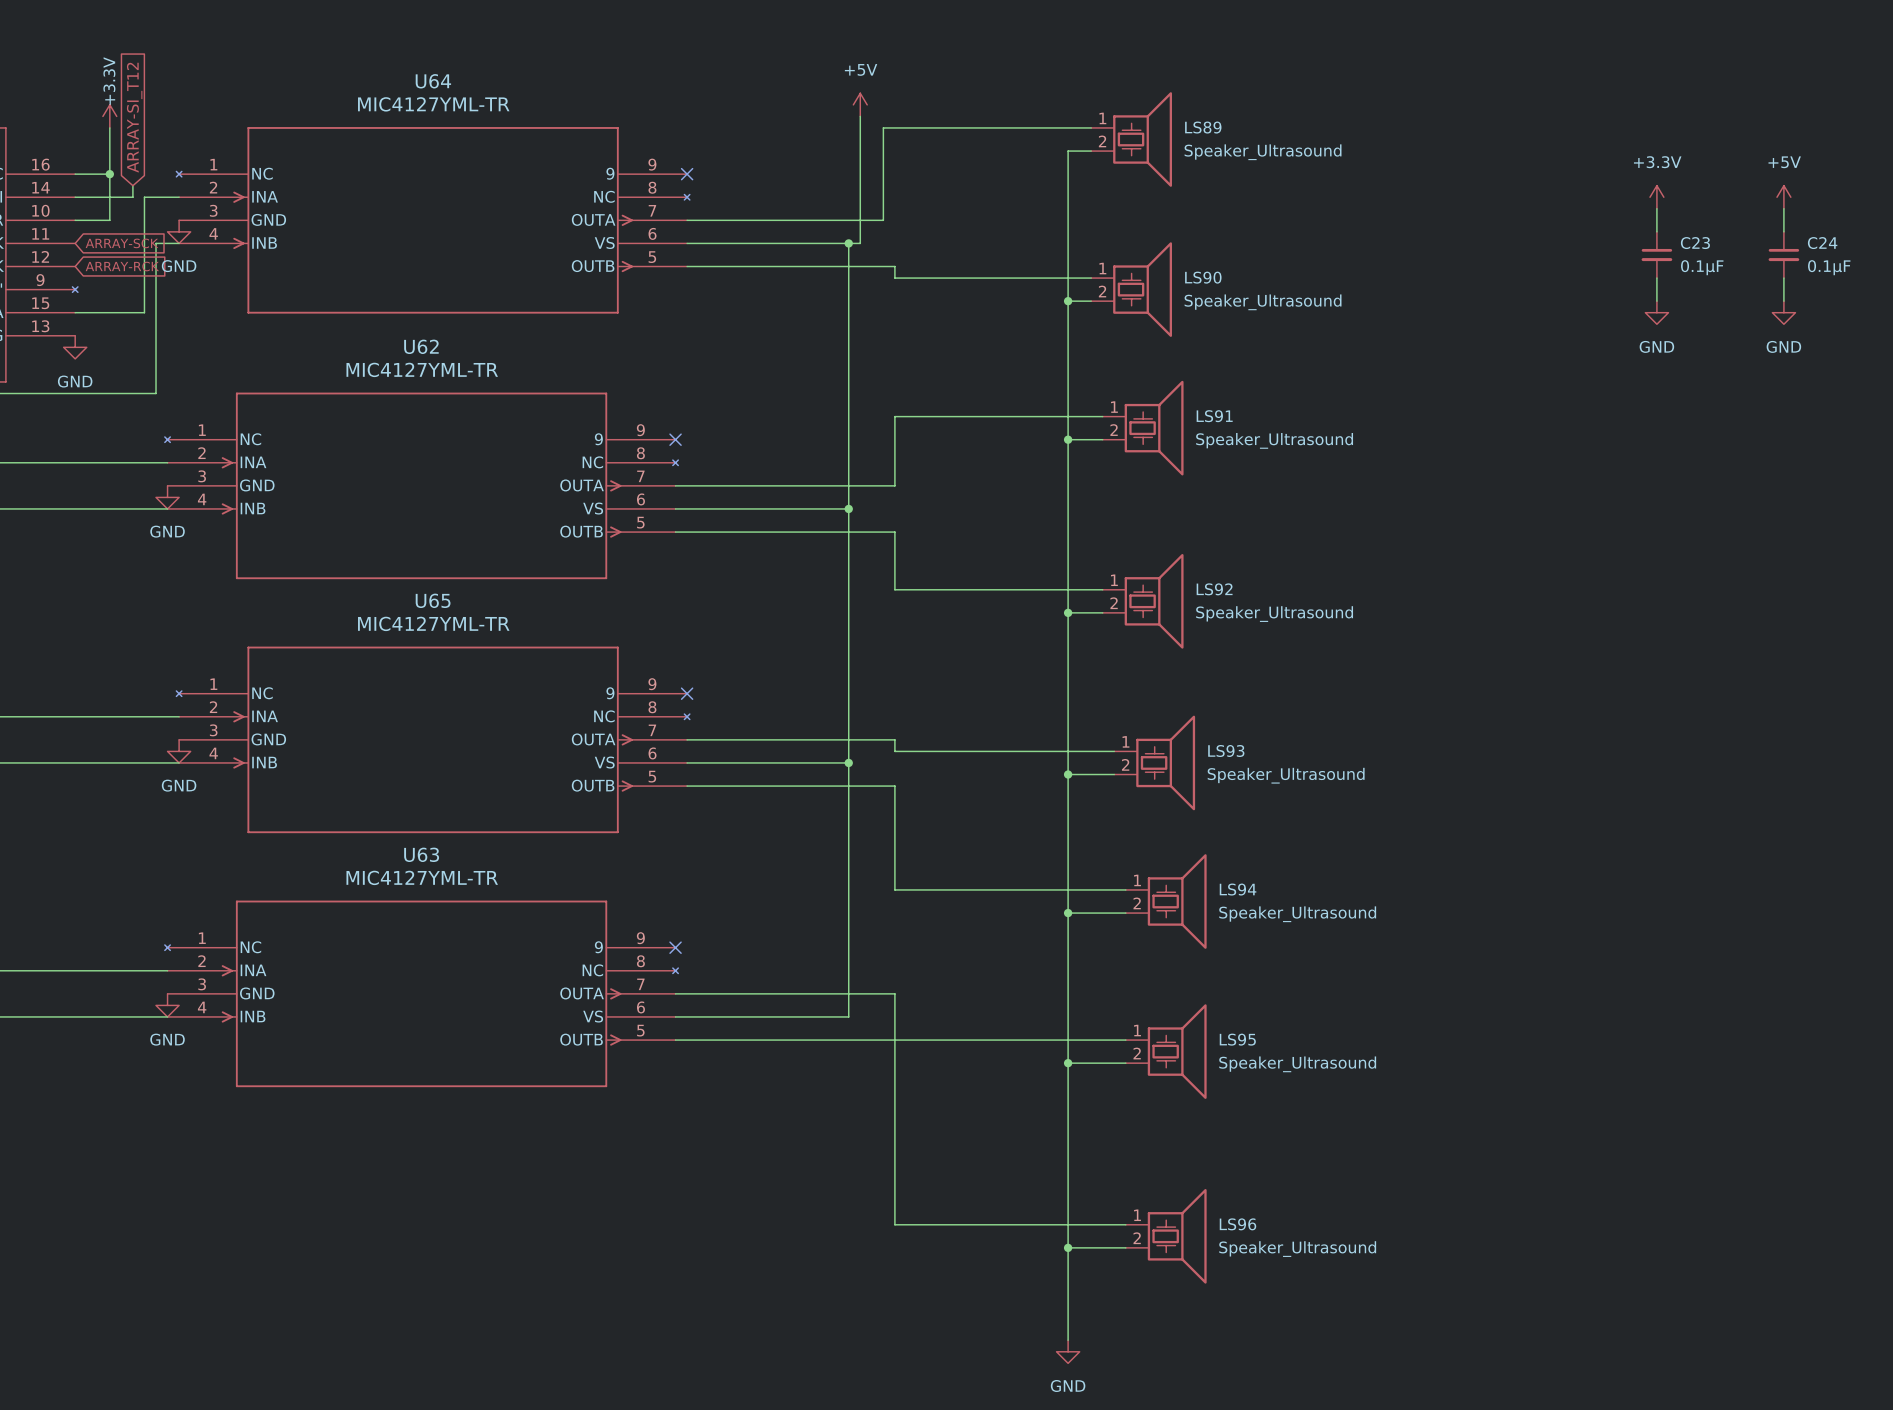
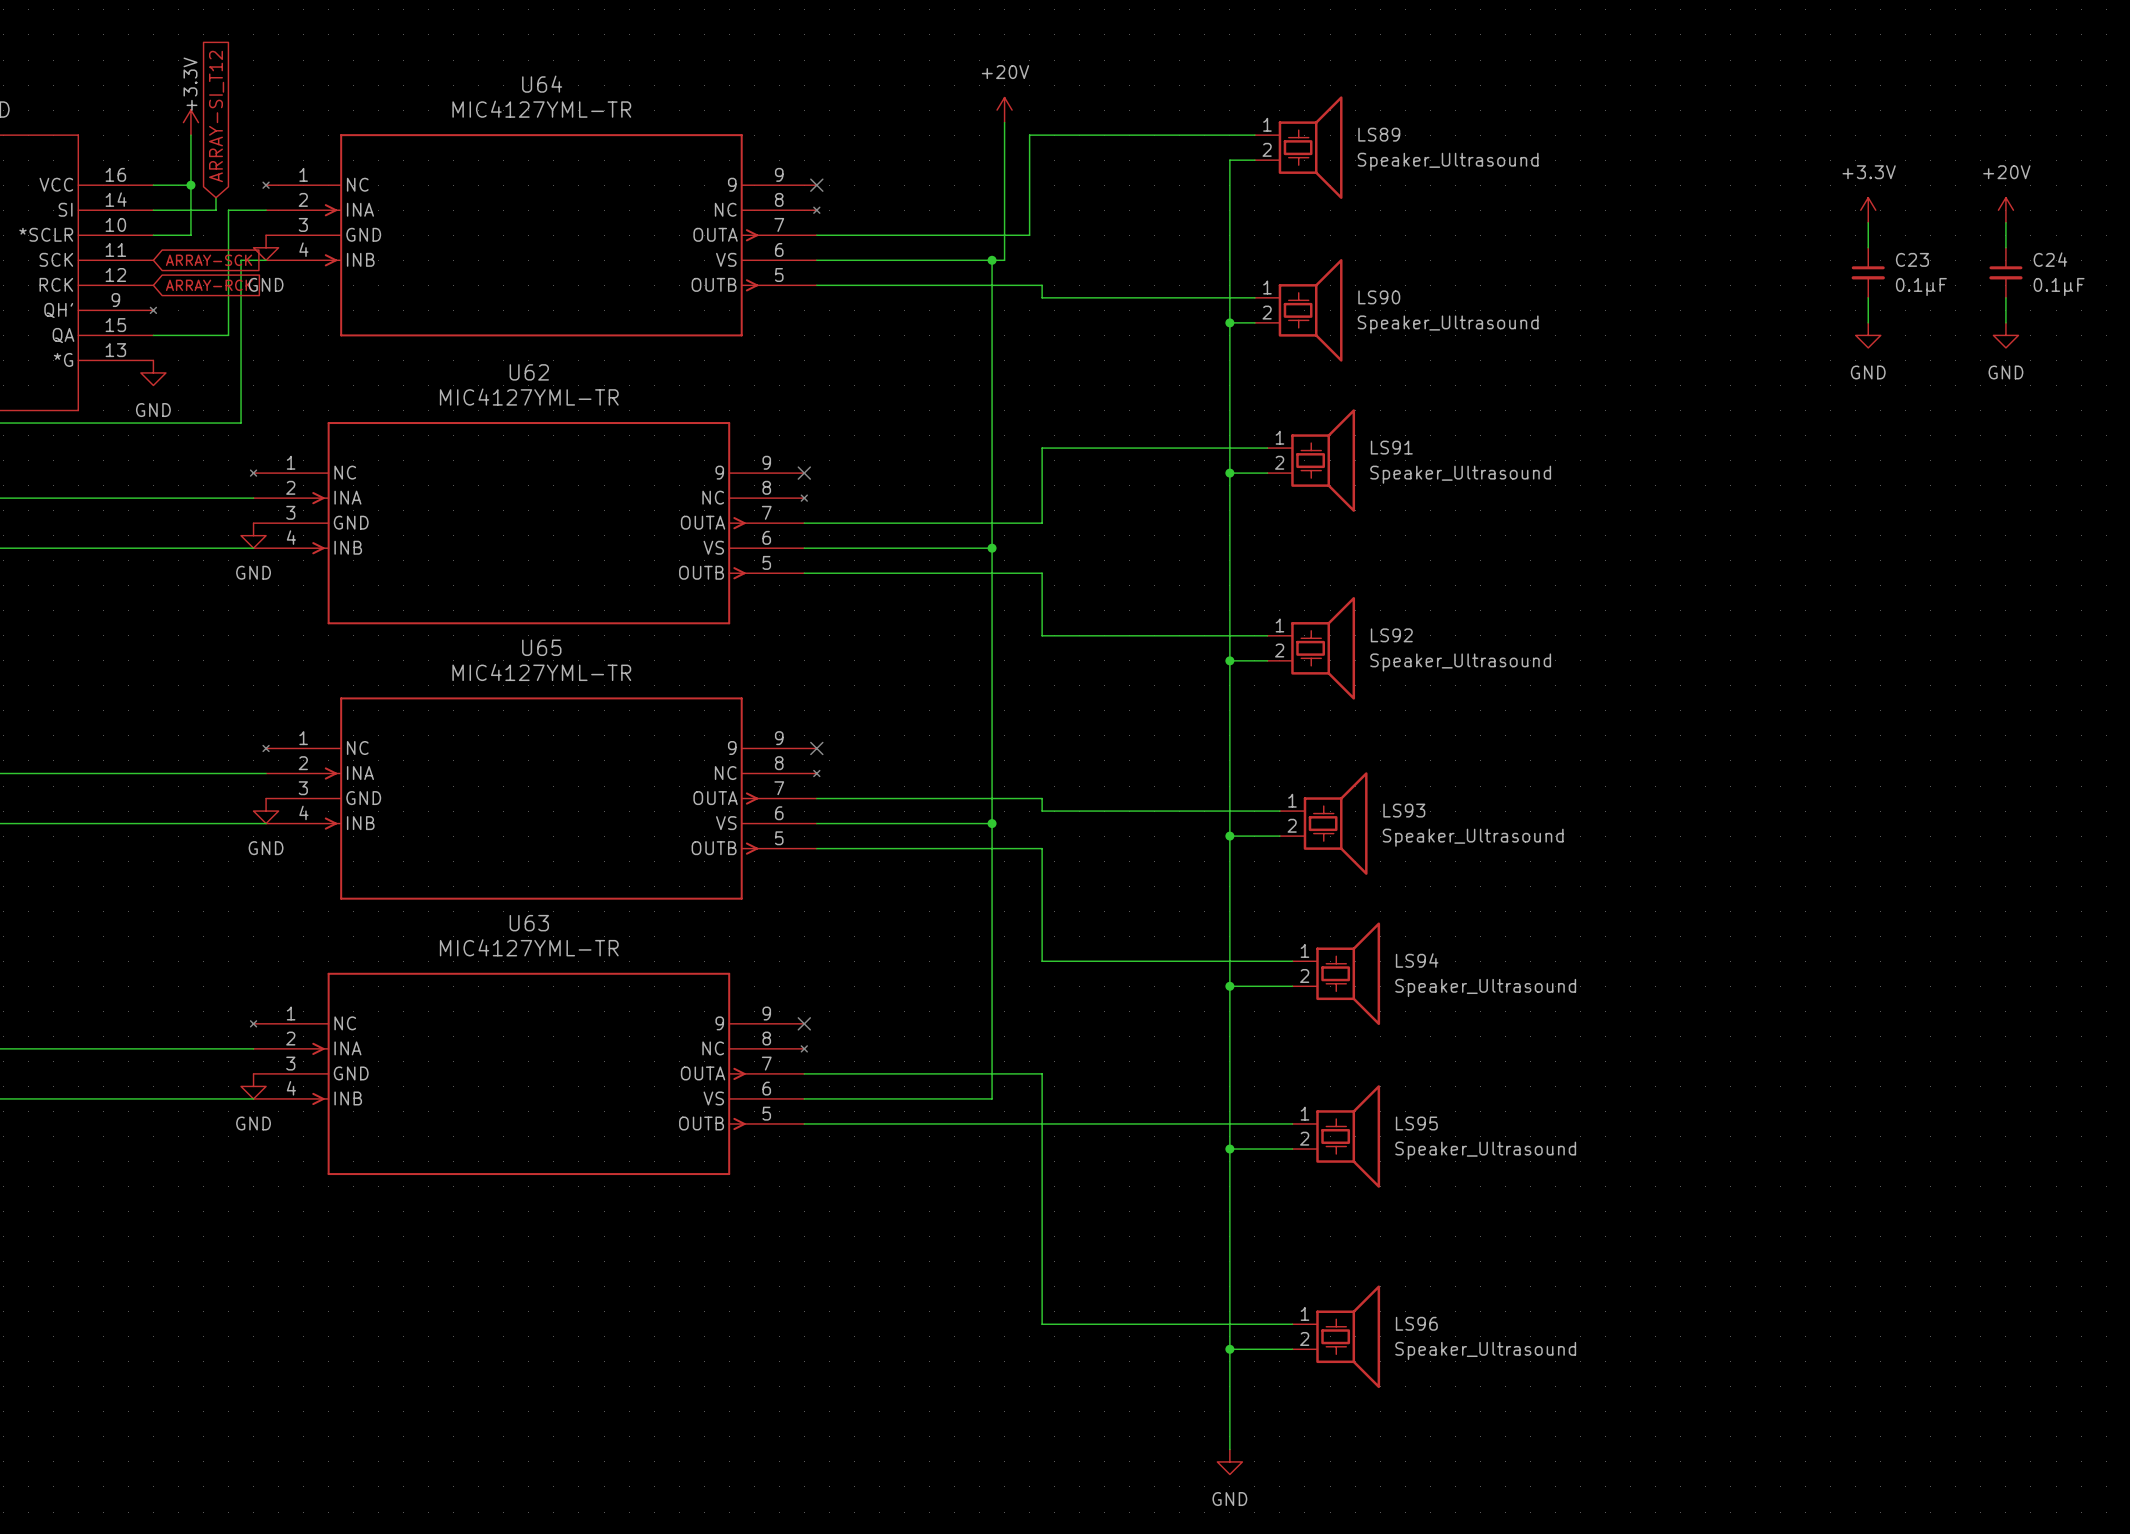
power symbol: +5V (860, 104) -> +20V (1004, 110)
power symbol: +5V (1783, 197) -> +20V (2005, 210)

